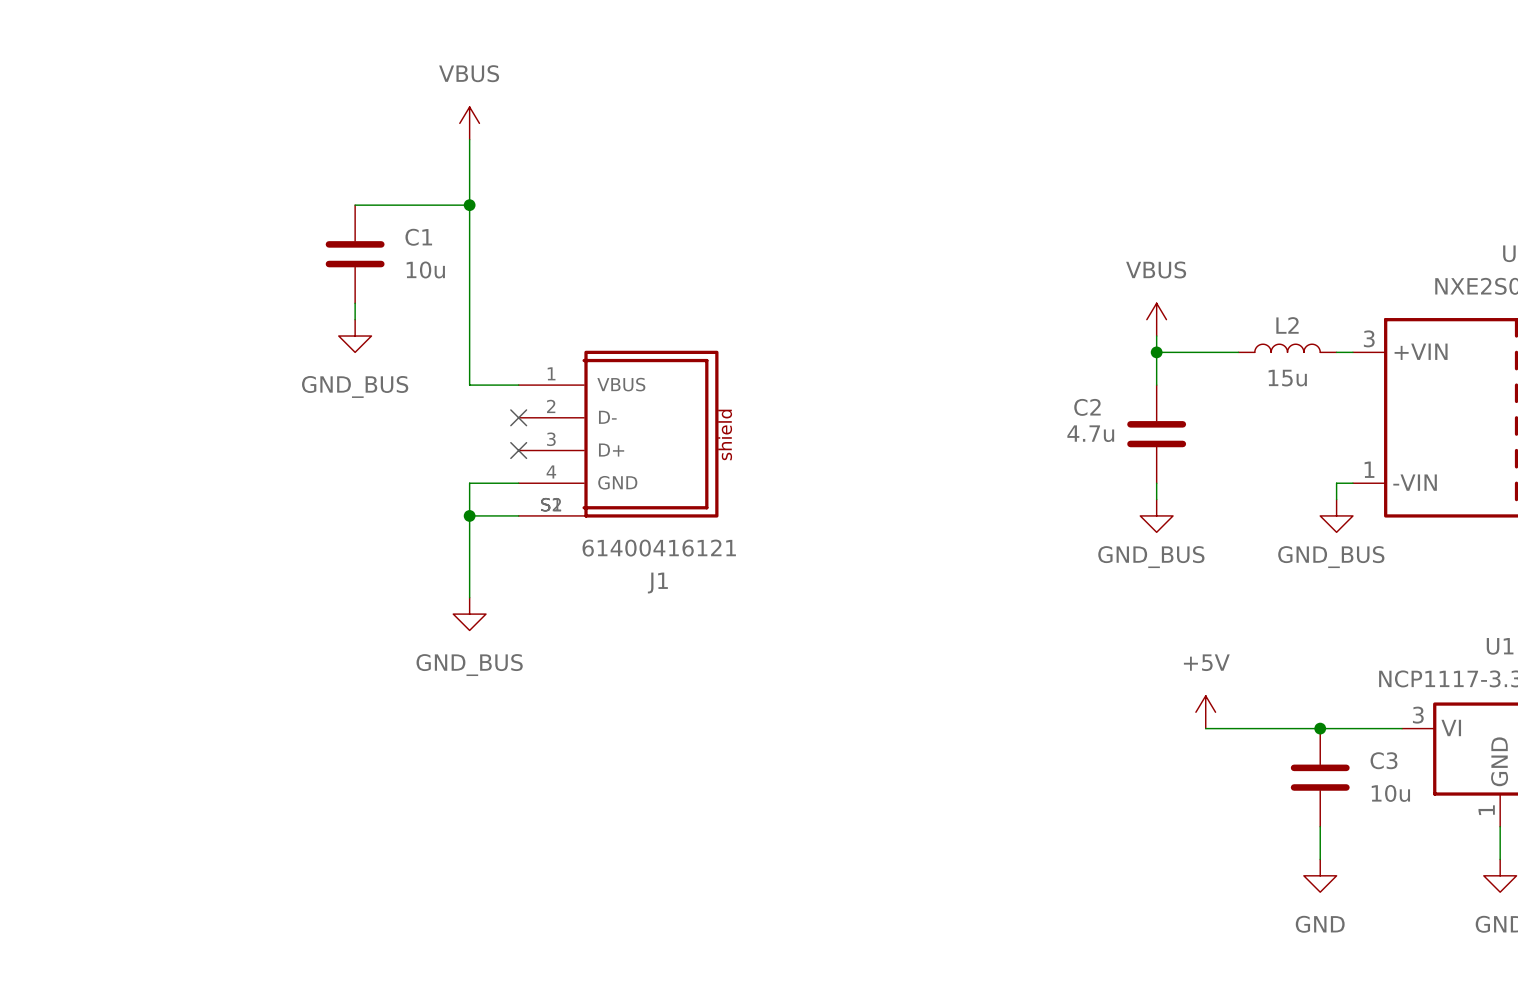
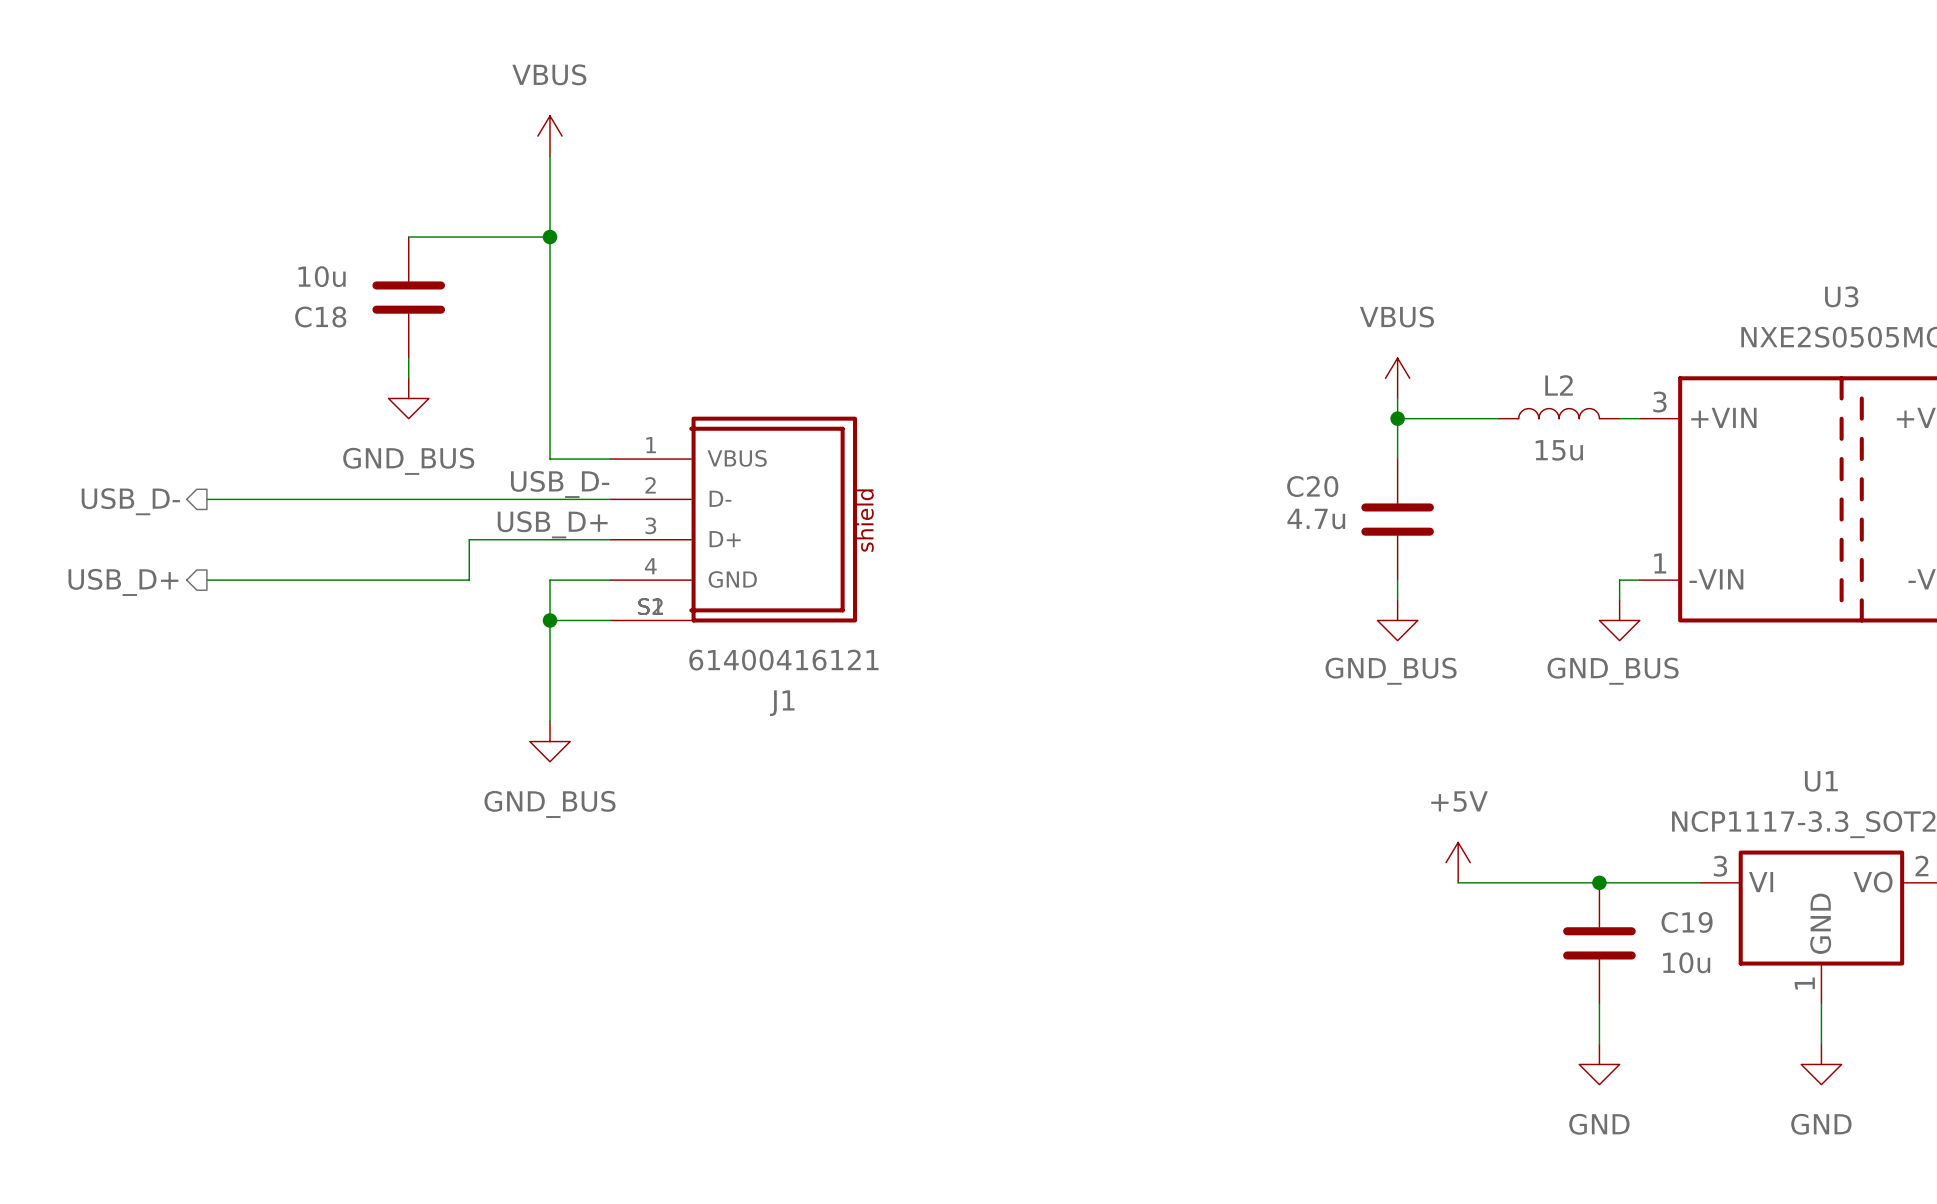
C1 name: C1 (418, 237) -> C18 (320, 317)
C1 value position: 10u (425, 269) -> 10u (322, 276)
label: none -> USB_D- (560, 484)
C2 name: C2 (1087, 407) -> C20 (1312, 486)
wire: none -> (206, 499) (610, 499)
no-connect mark: (518, 417) -> none
hierarchical label: none -> USB_D- (130, 501)
label: none -> USB_D+ (552, 524)
wire: none -> (610, 539) (469, 539) (469, 580) (206, 580)
no-connect mark: (518, 450) -> none
hierarchical label: none -> USB_D+ (123, 582)
C3 name: C3 (1384, 760) -> C19 (1687, 922)

